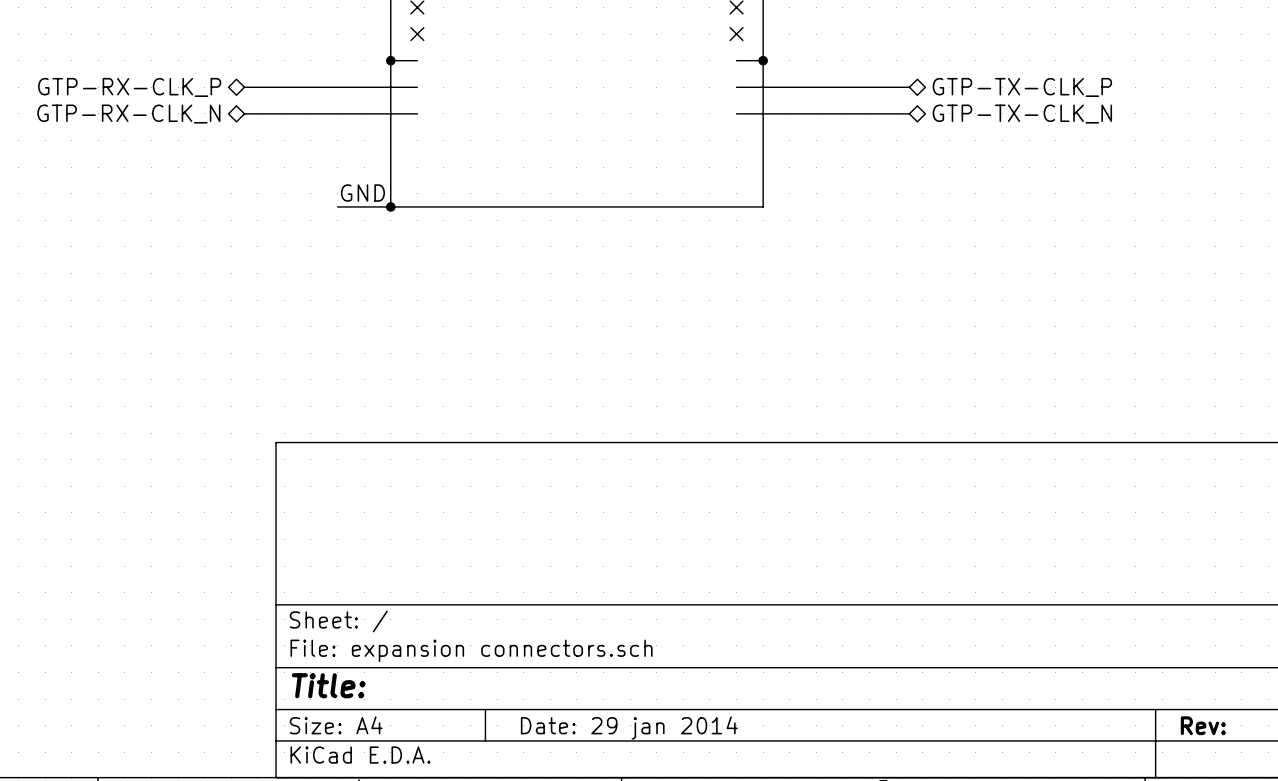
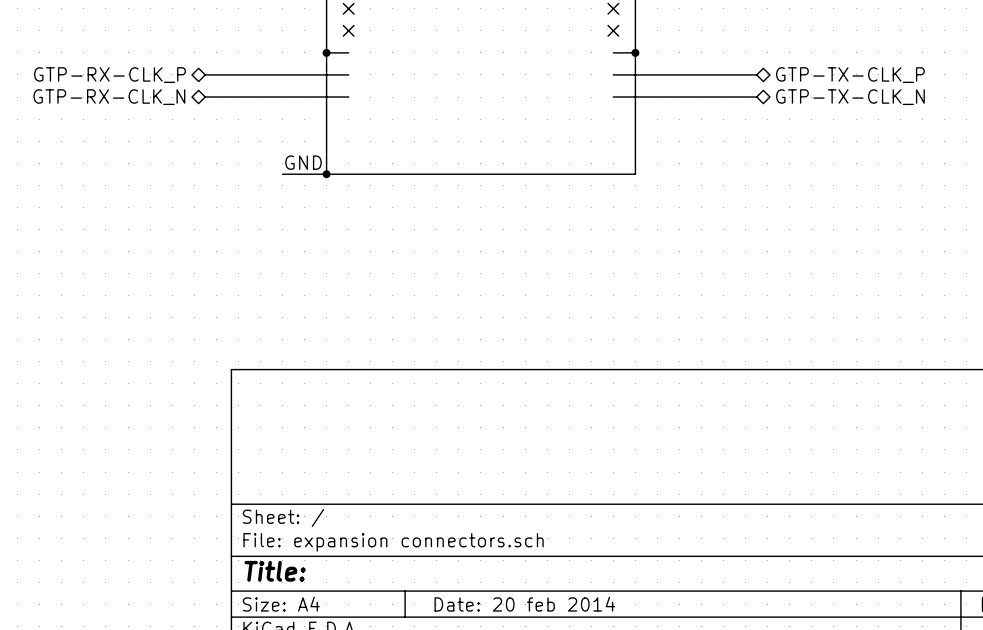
title block: Date: 29 jan 2014 (629, 727) -> Date: 20 feb 2014 (524, 604)

